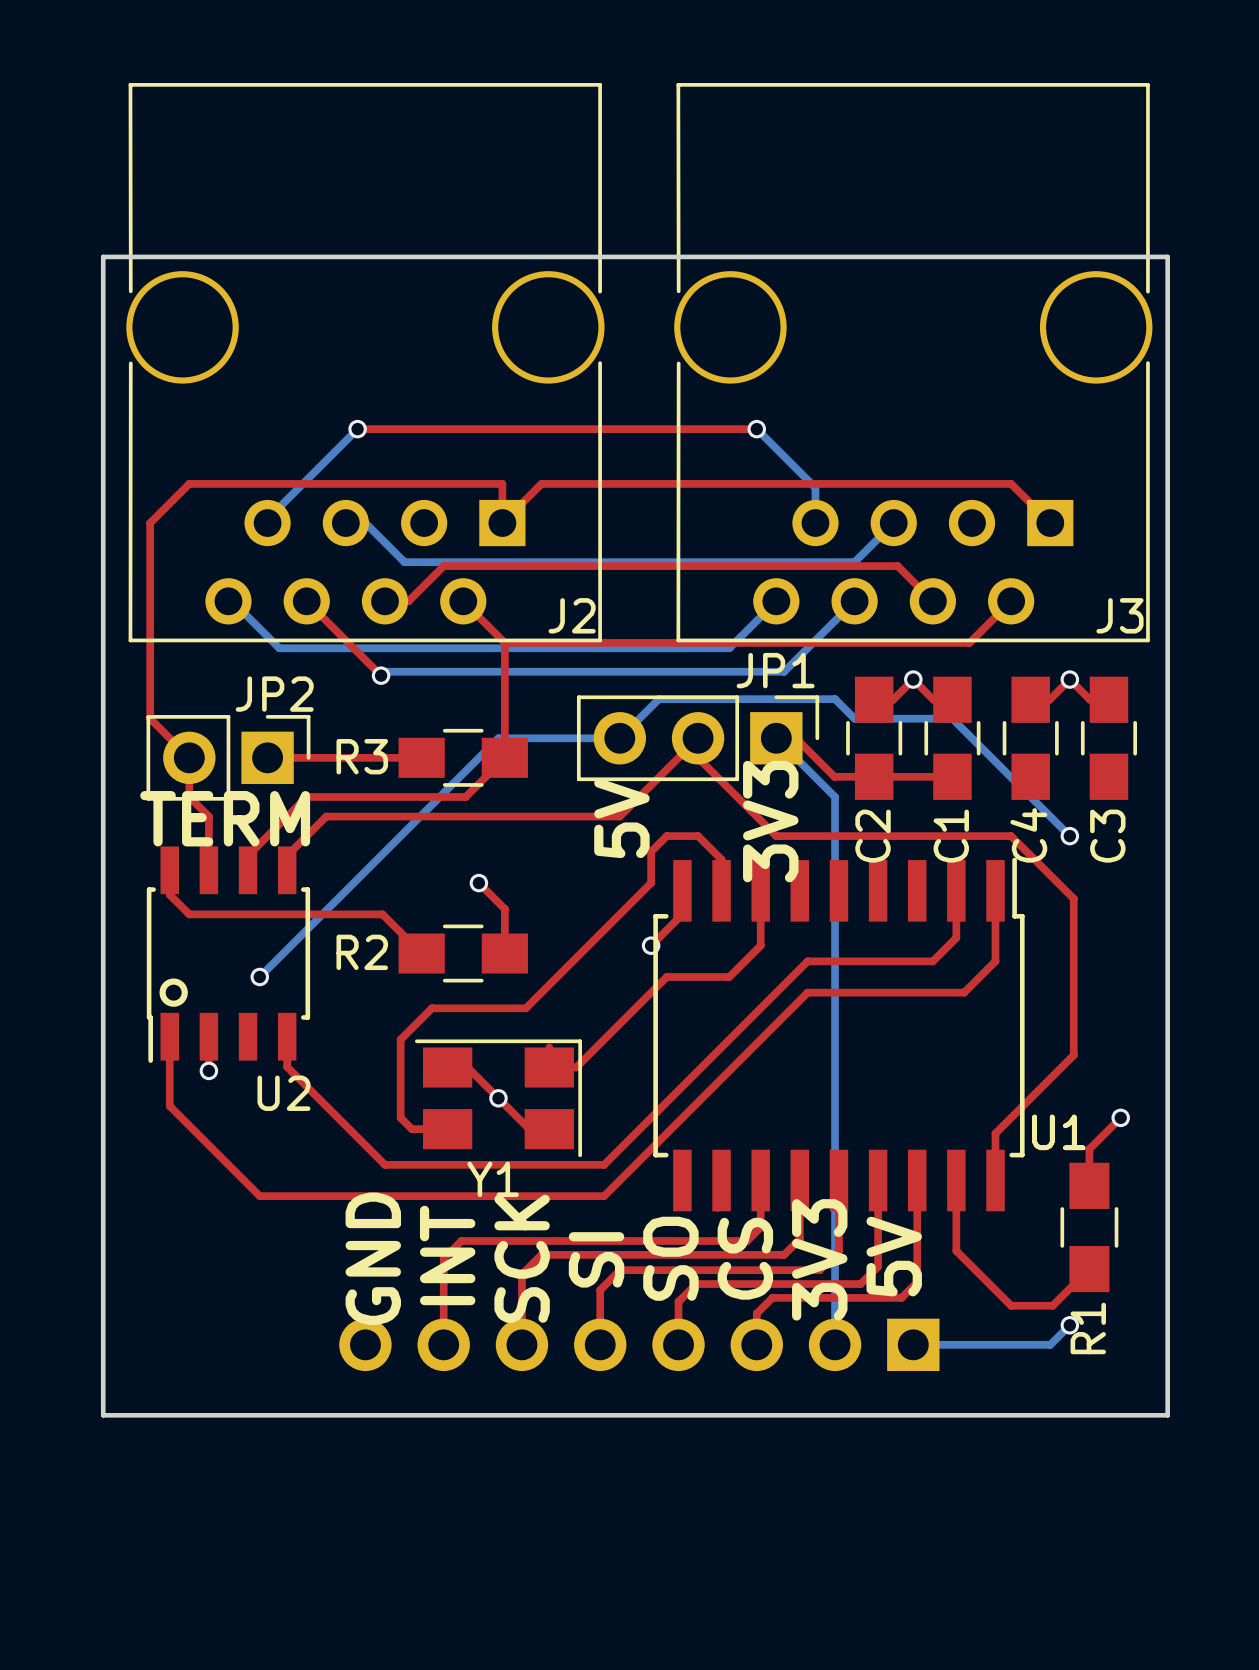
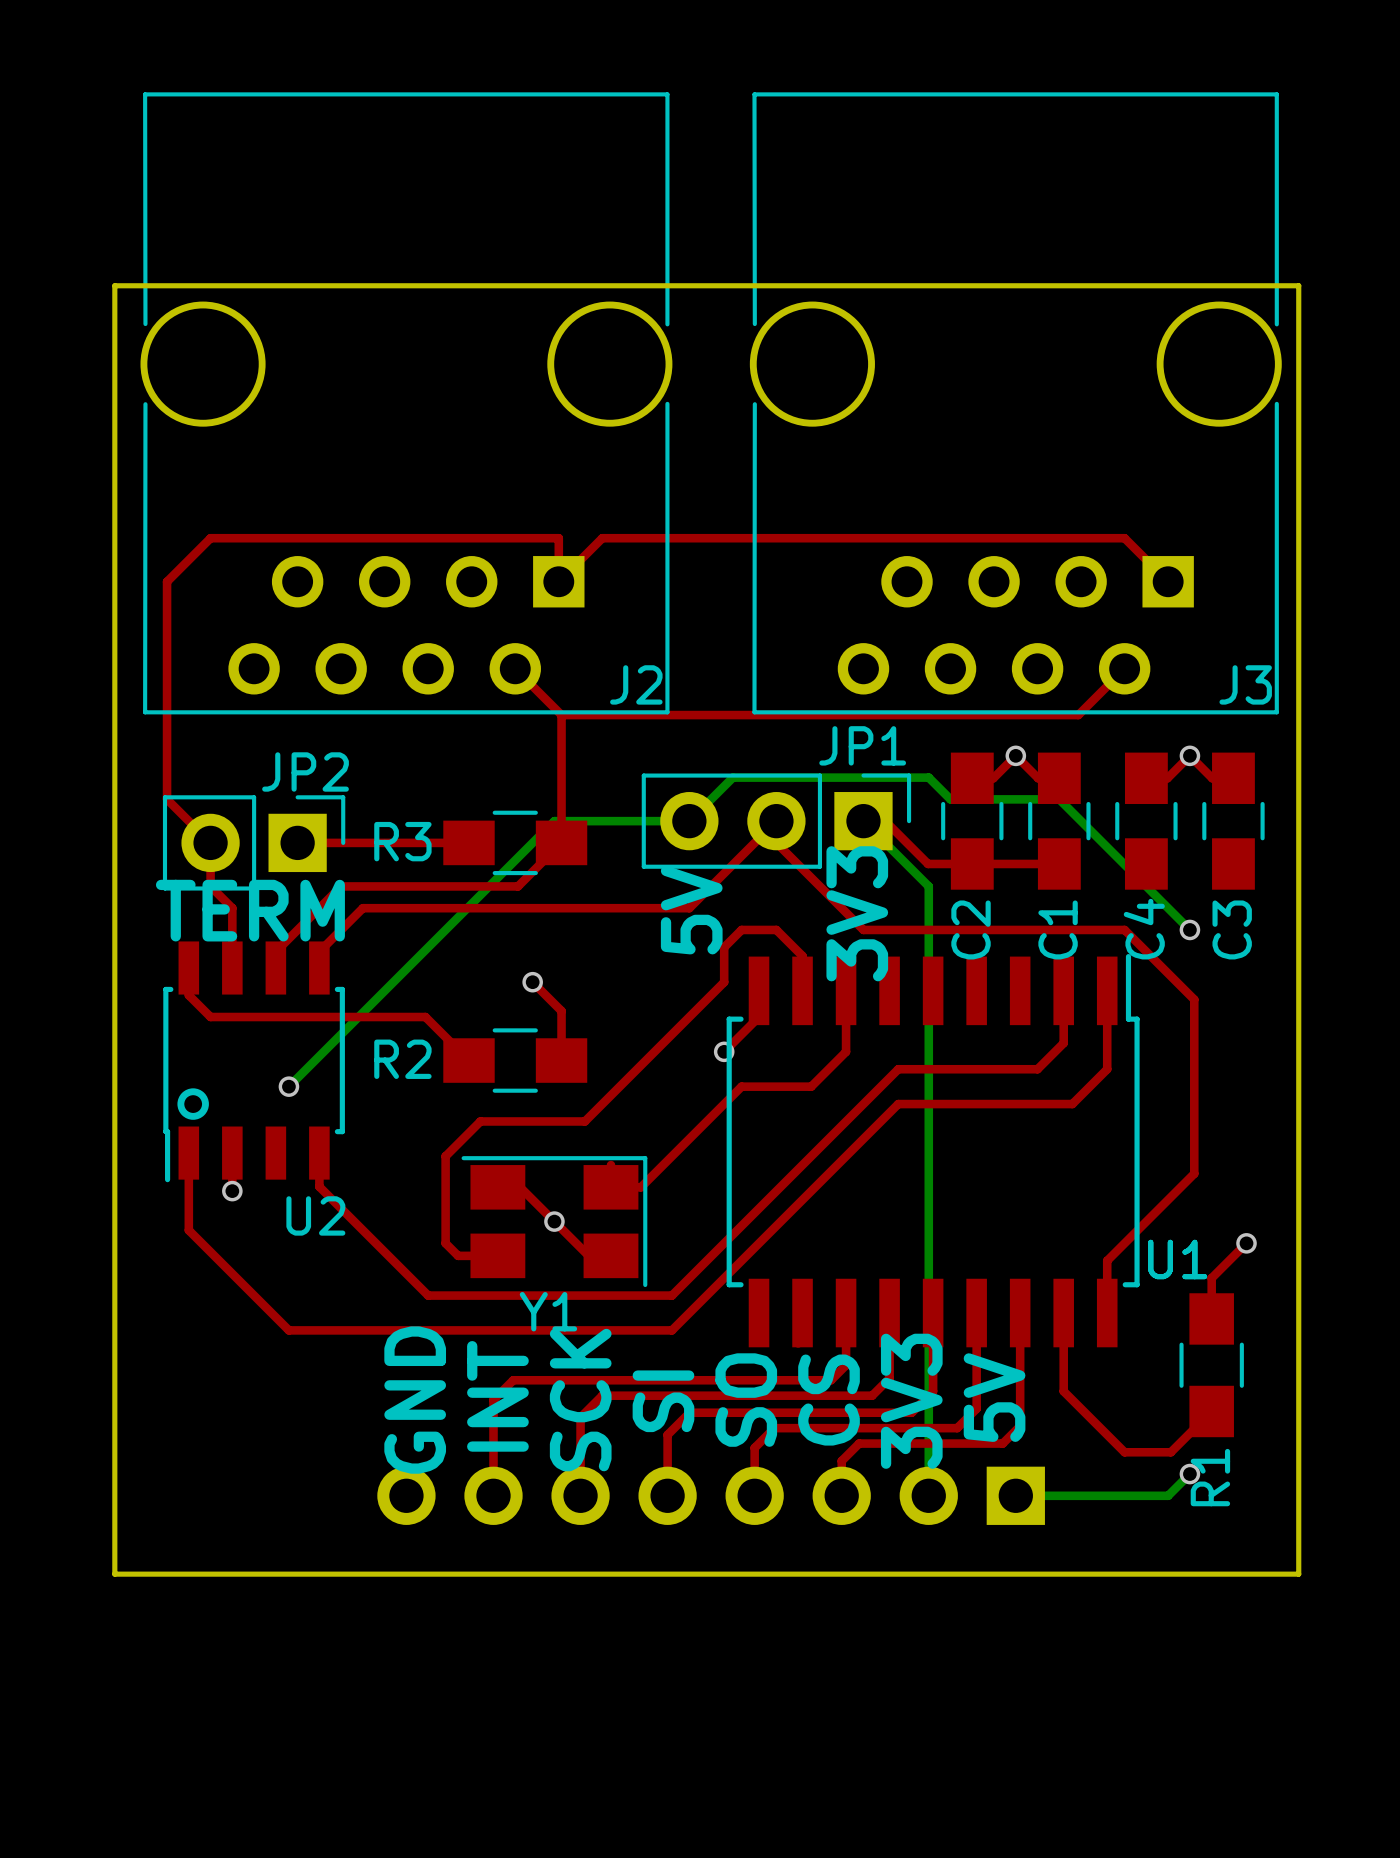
bottom track: (357, 429) (267, 519) (267, 523) -> none
top track: (357, 429) (756, 429) -> none
via: (357, 429) -> none
bottom track: (756, 429) (815, 487) (815, 523) -> none
via: (756, 429) -> none
bottom track: (345, 523) (365, 523) (404, 562) (854, 562) (893, 523) -> none
bottom track: (228, 601) (232, 601) (279, 648) (729, 648) (776, 601) -> none
top track: (306, 601) (381, 675) -> none
top track: (385, 601) (408, 601) (443, 566) (897, 566) (932, 601) -> none
bottom track: (854, 601) (784, 671) (385, 671) (381, 675) -> none
via: (381, 675) -> none

